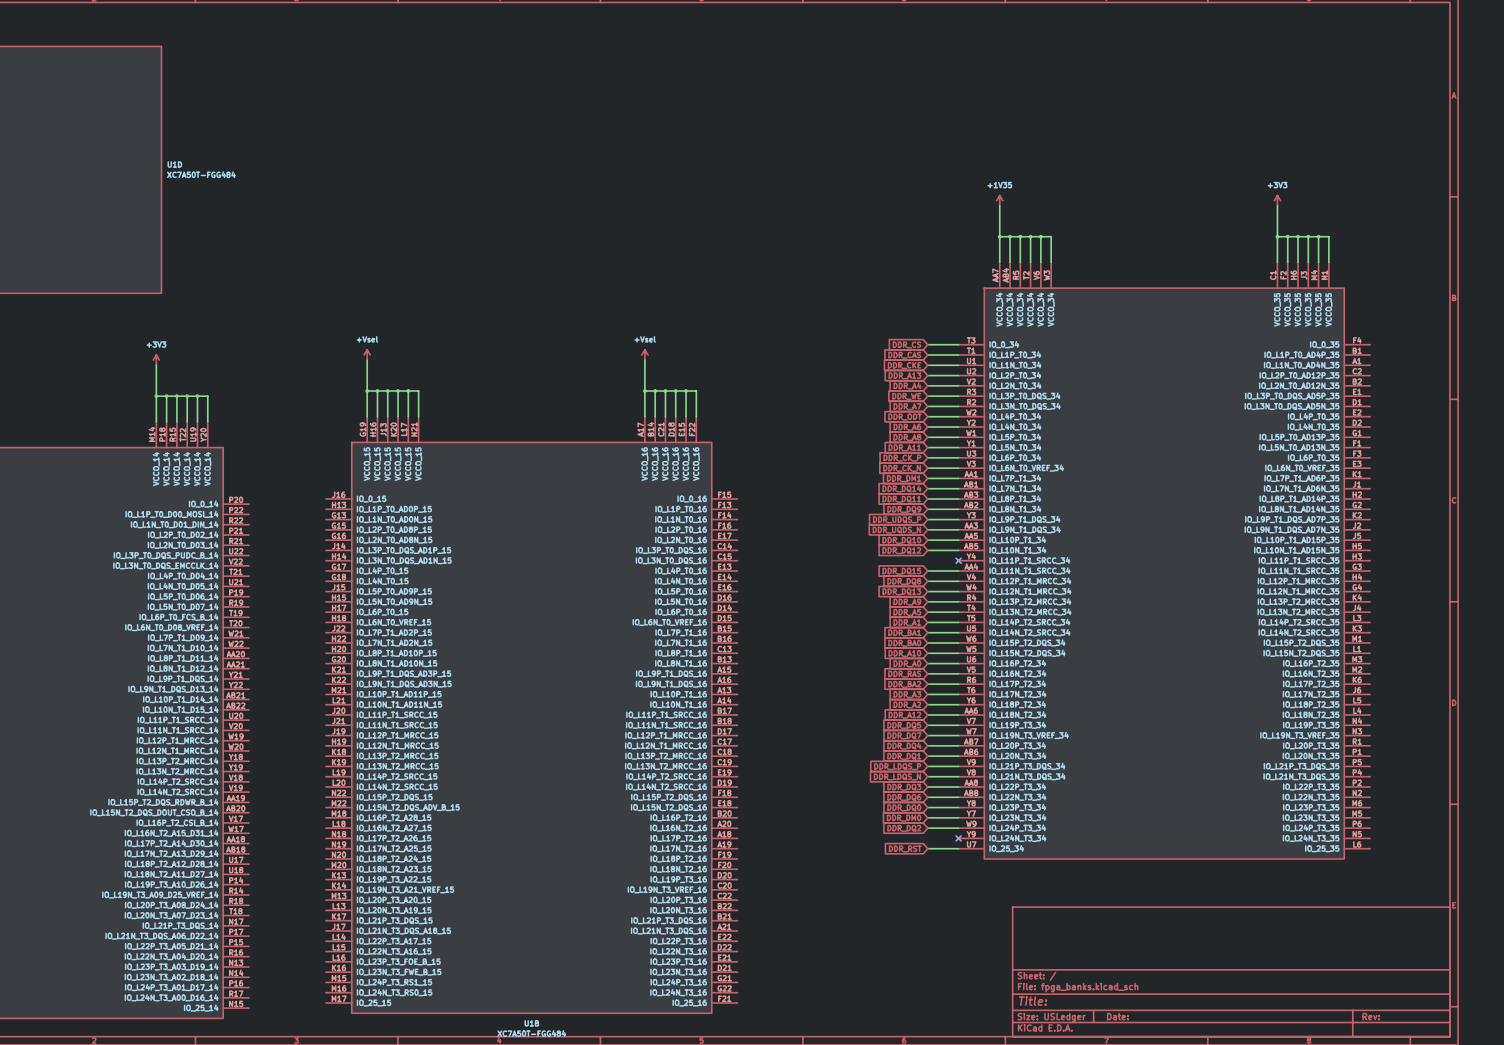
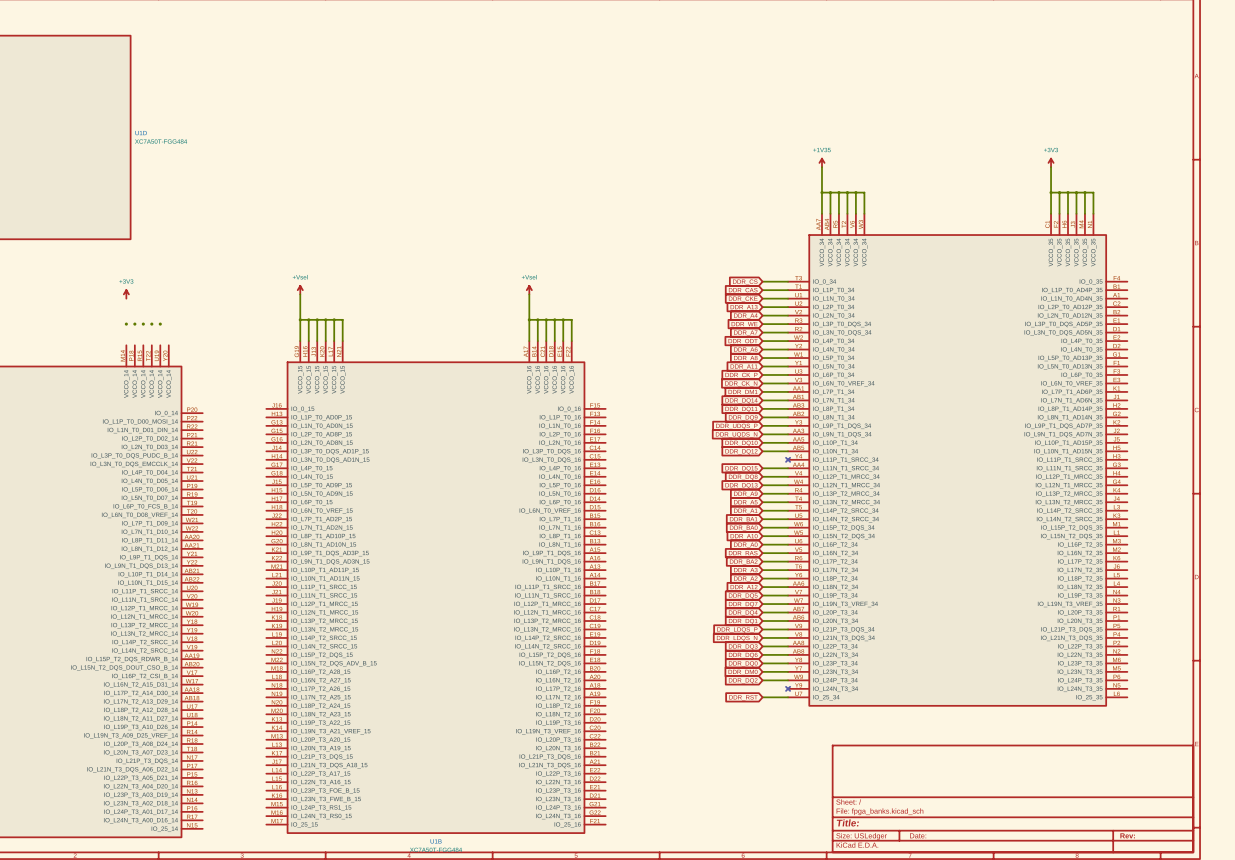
wire: (156, 365) (156, 421) -> none
wire: (156, 396) (207, 396) (207, 421) -> none
wire: (166, 396) (166, 421) -> none
wire: (176, 396) (176, 421) -> none
wire: (187, 396) (187, 421) -> none
wire: (197, 396) (197, 421) -> none

